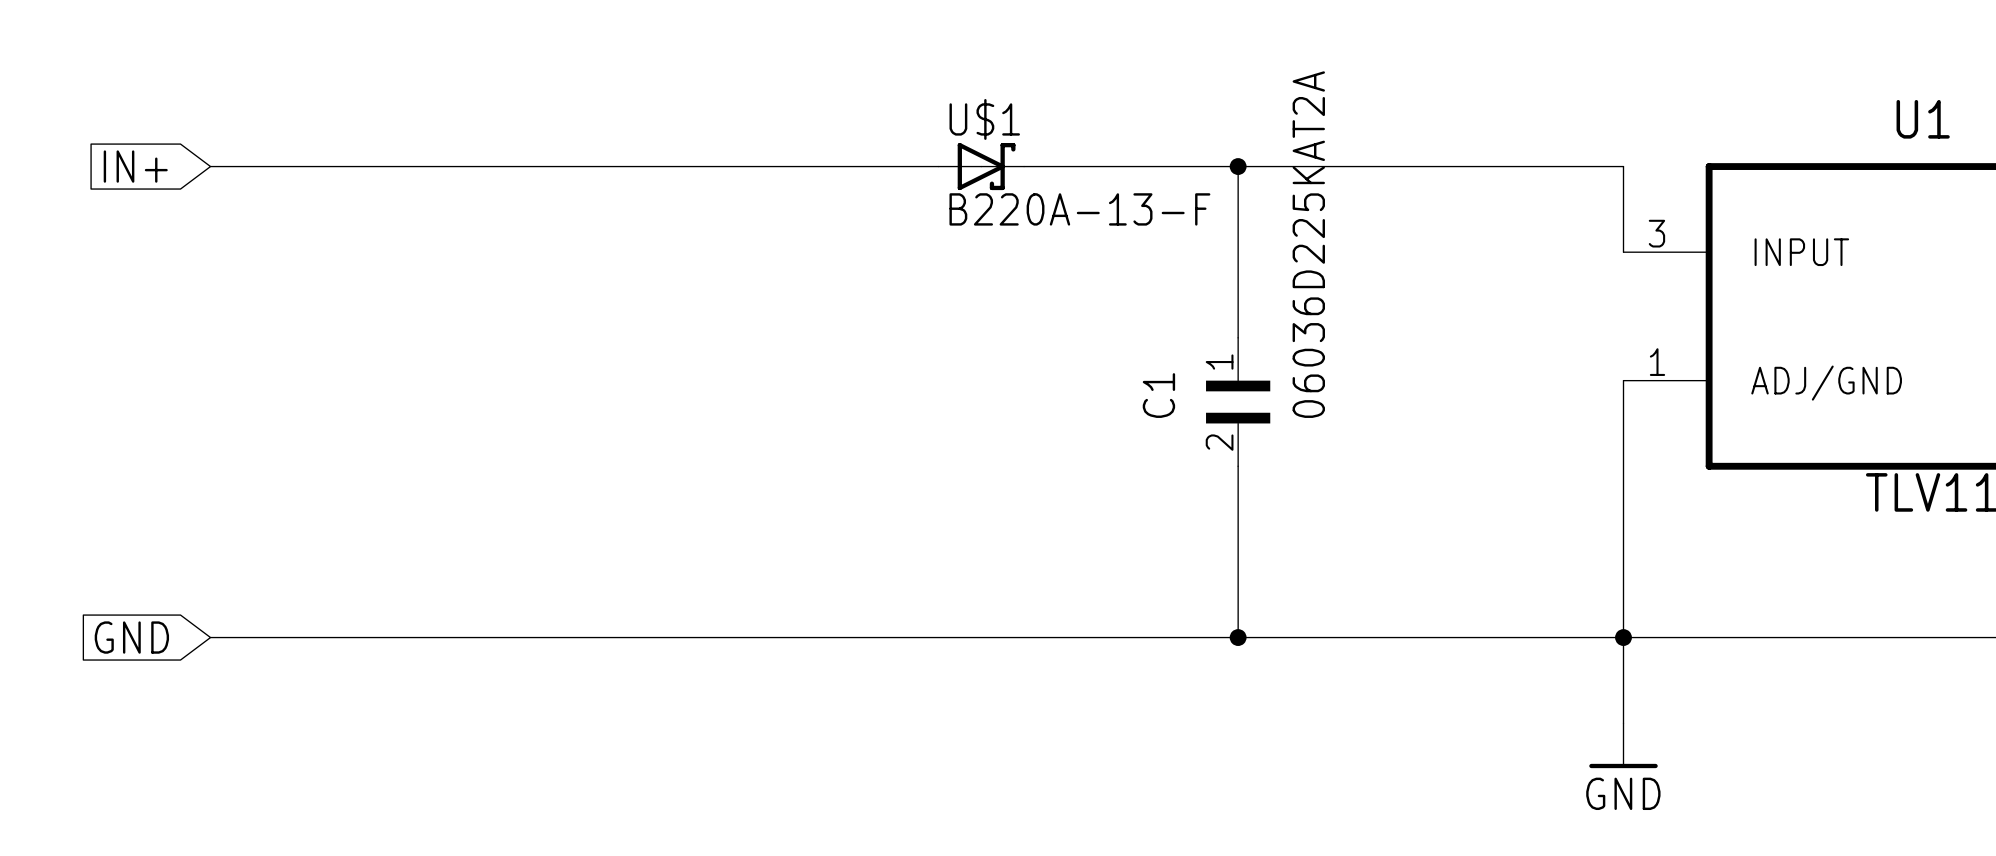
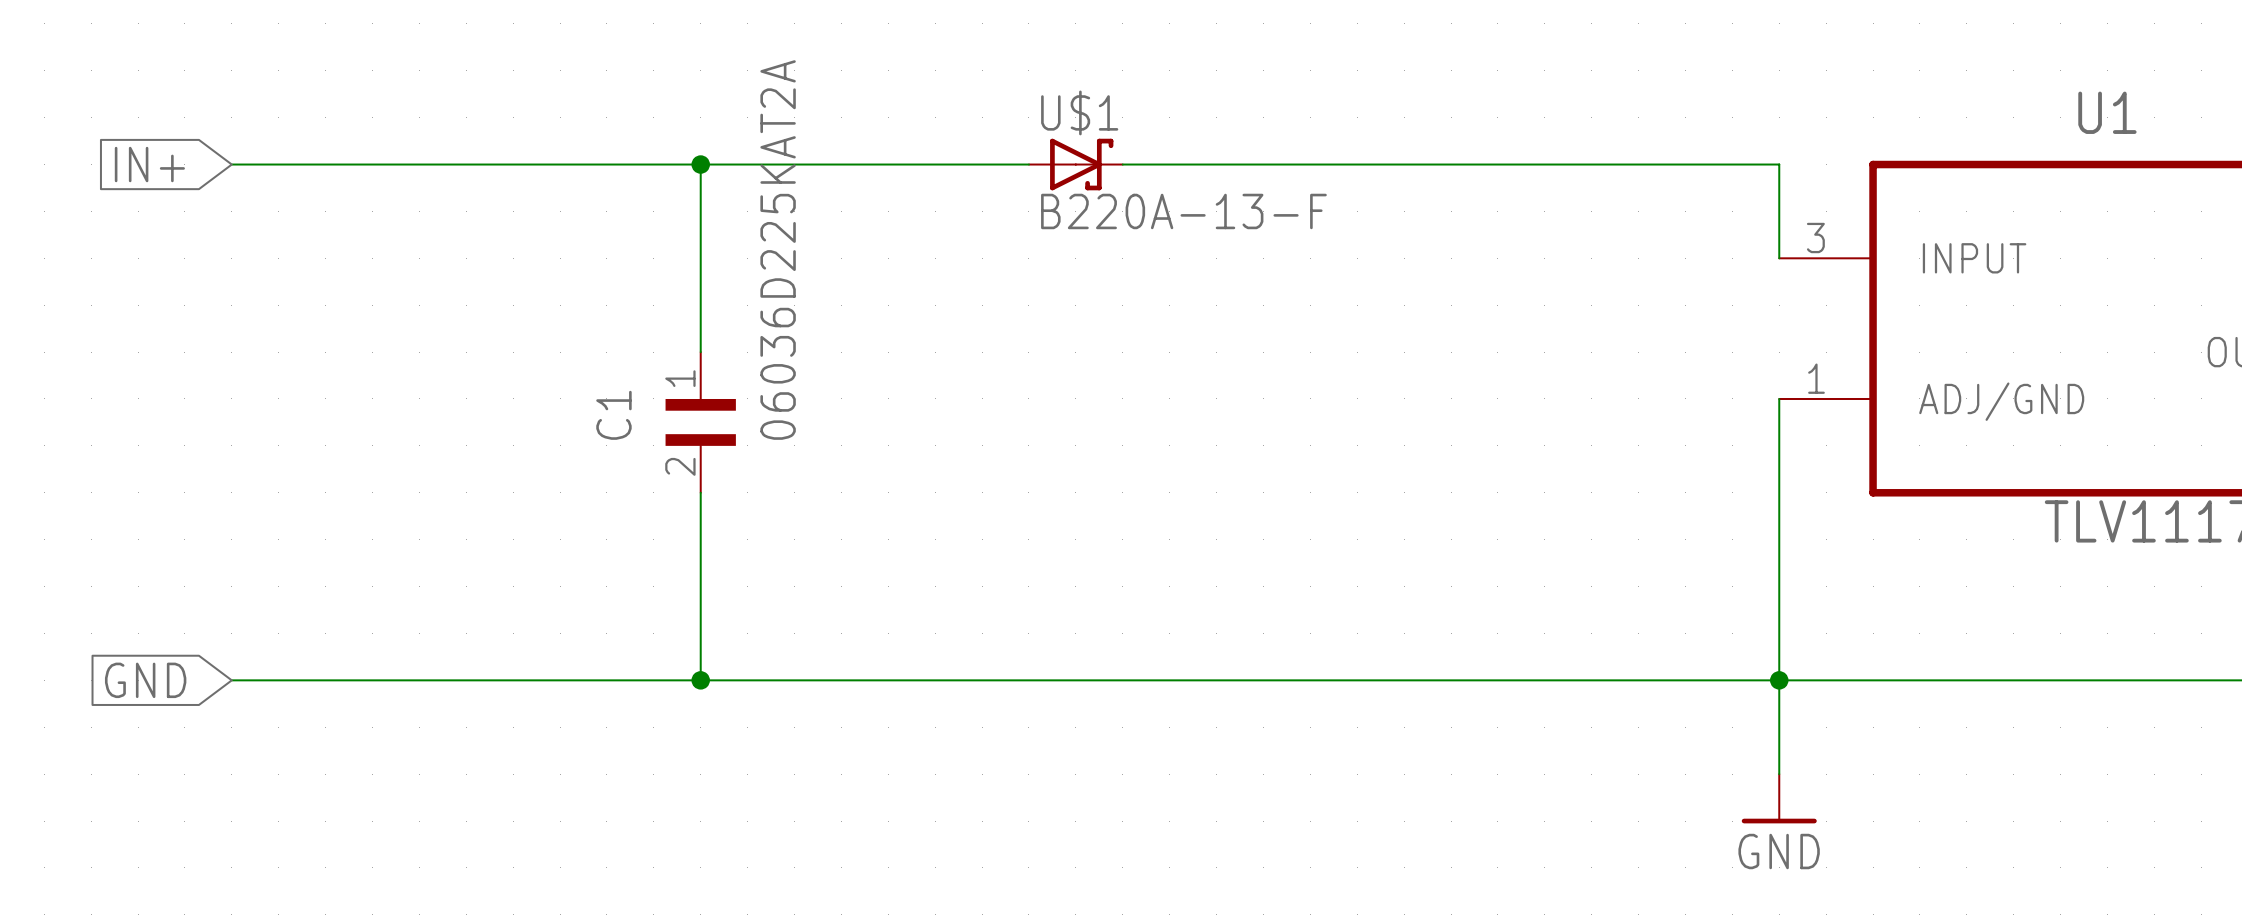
wire: none -> (700, 164) (700, 352)
junction: none -> (700, 164)
wire: (1238, 166) (1238, 337) -> none
junction: (1238, 166) -> none
C1 position: (1238, 402) -> (700, 422)
wire: none -> (700, 492) (700, 680)
wire: (1238, 466) (1238, 637) -> none
junction: none -> (700, 680)
junction: (1238, 637) -> none

